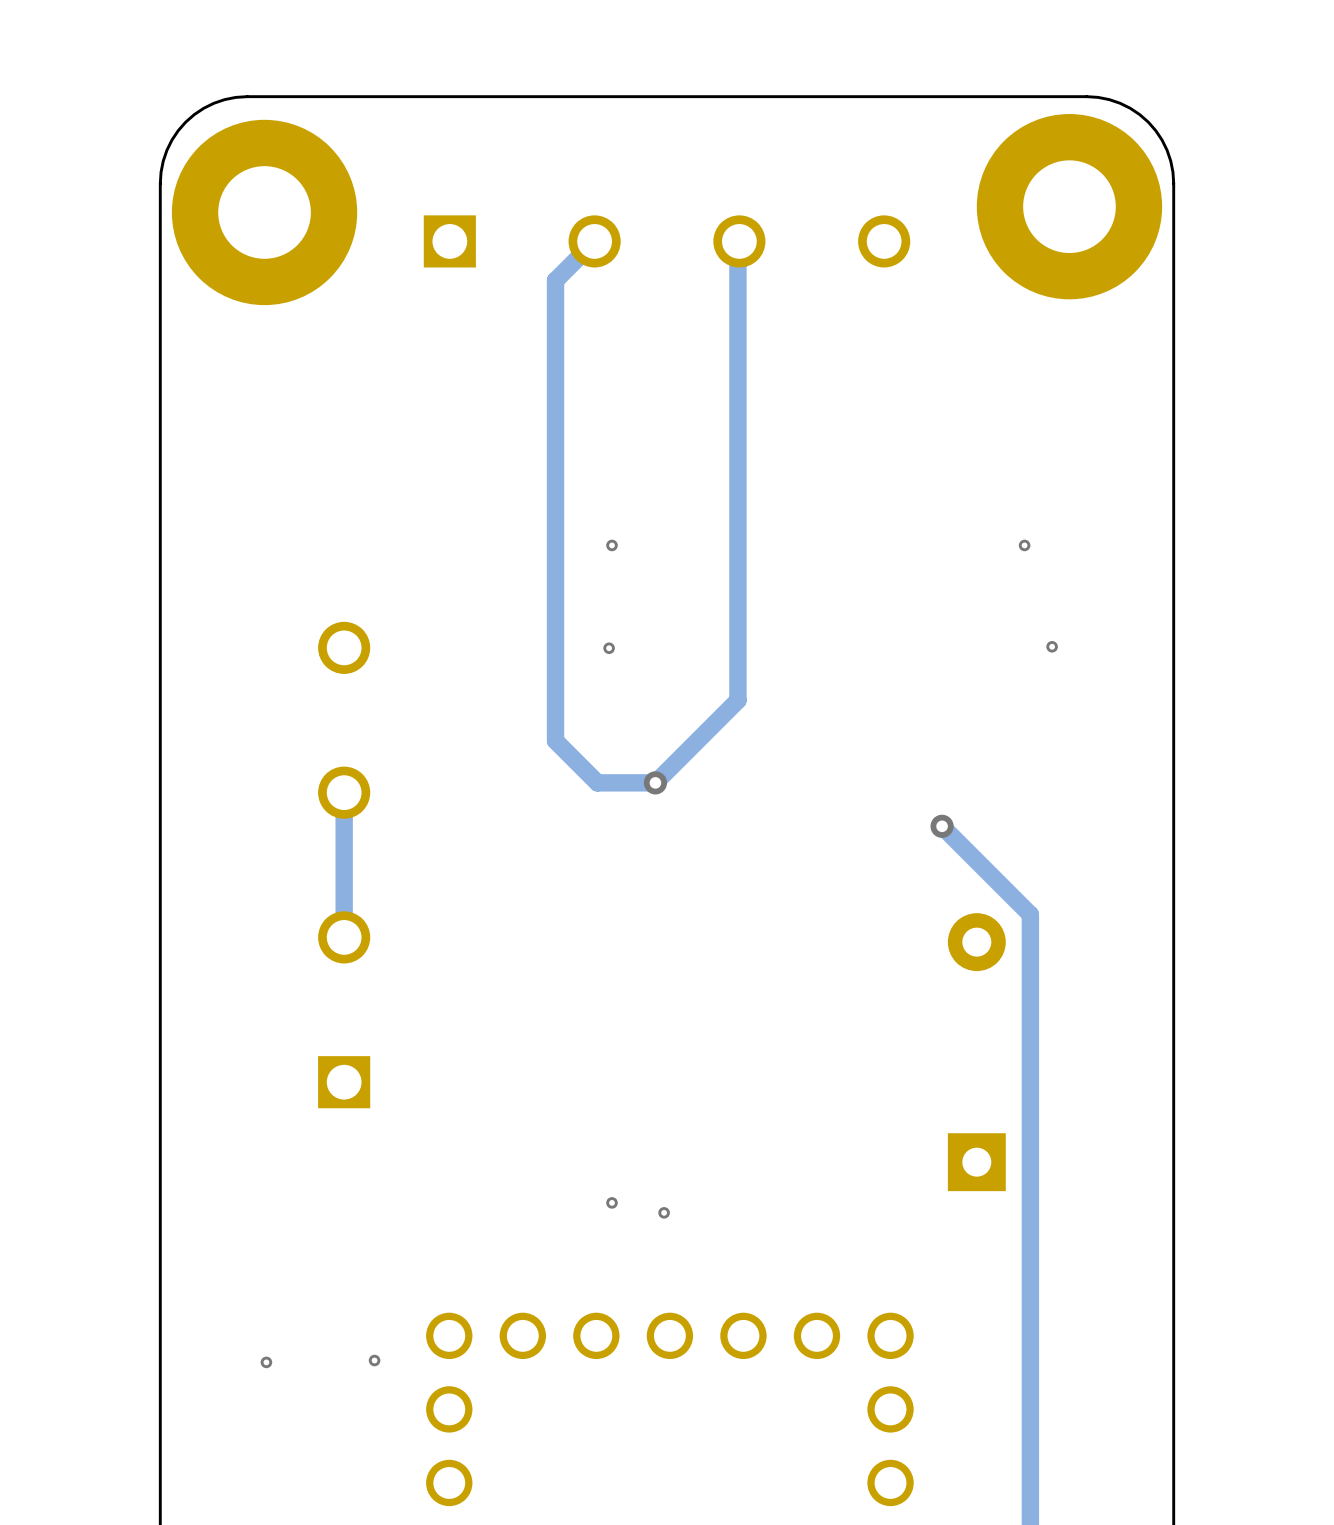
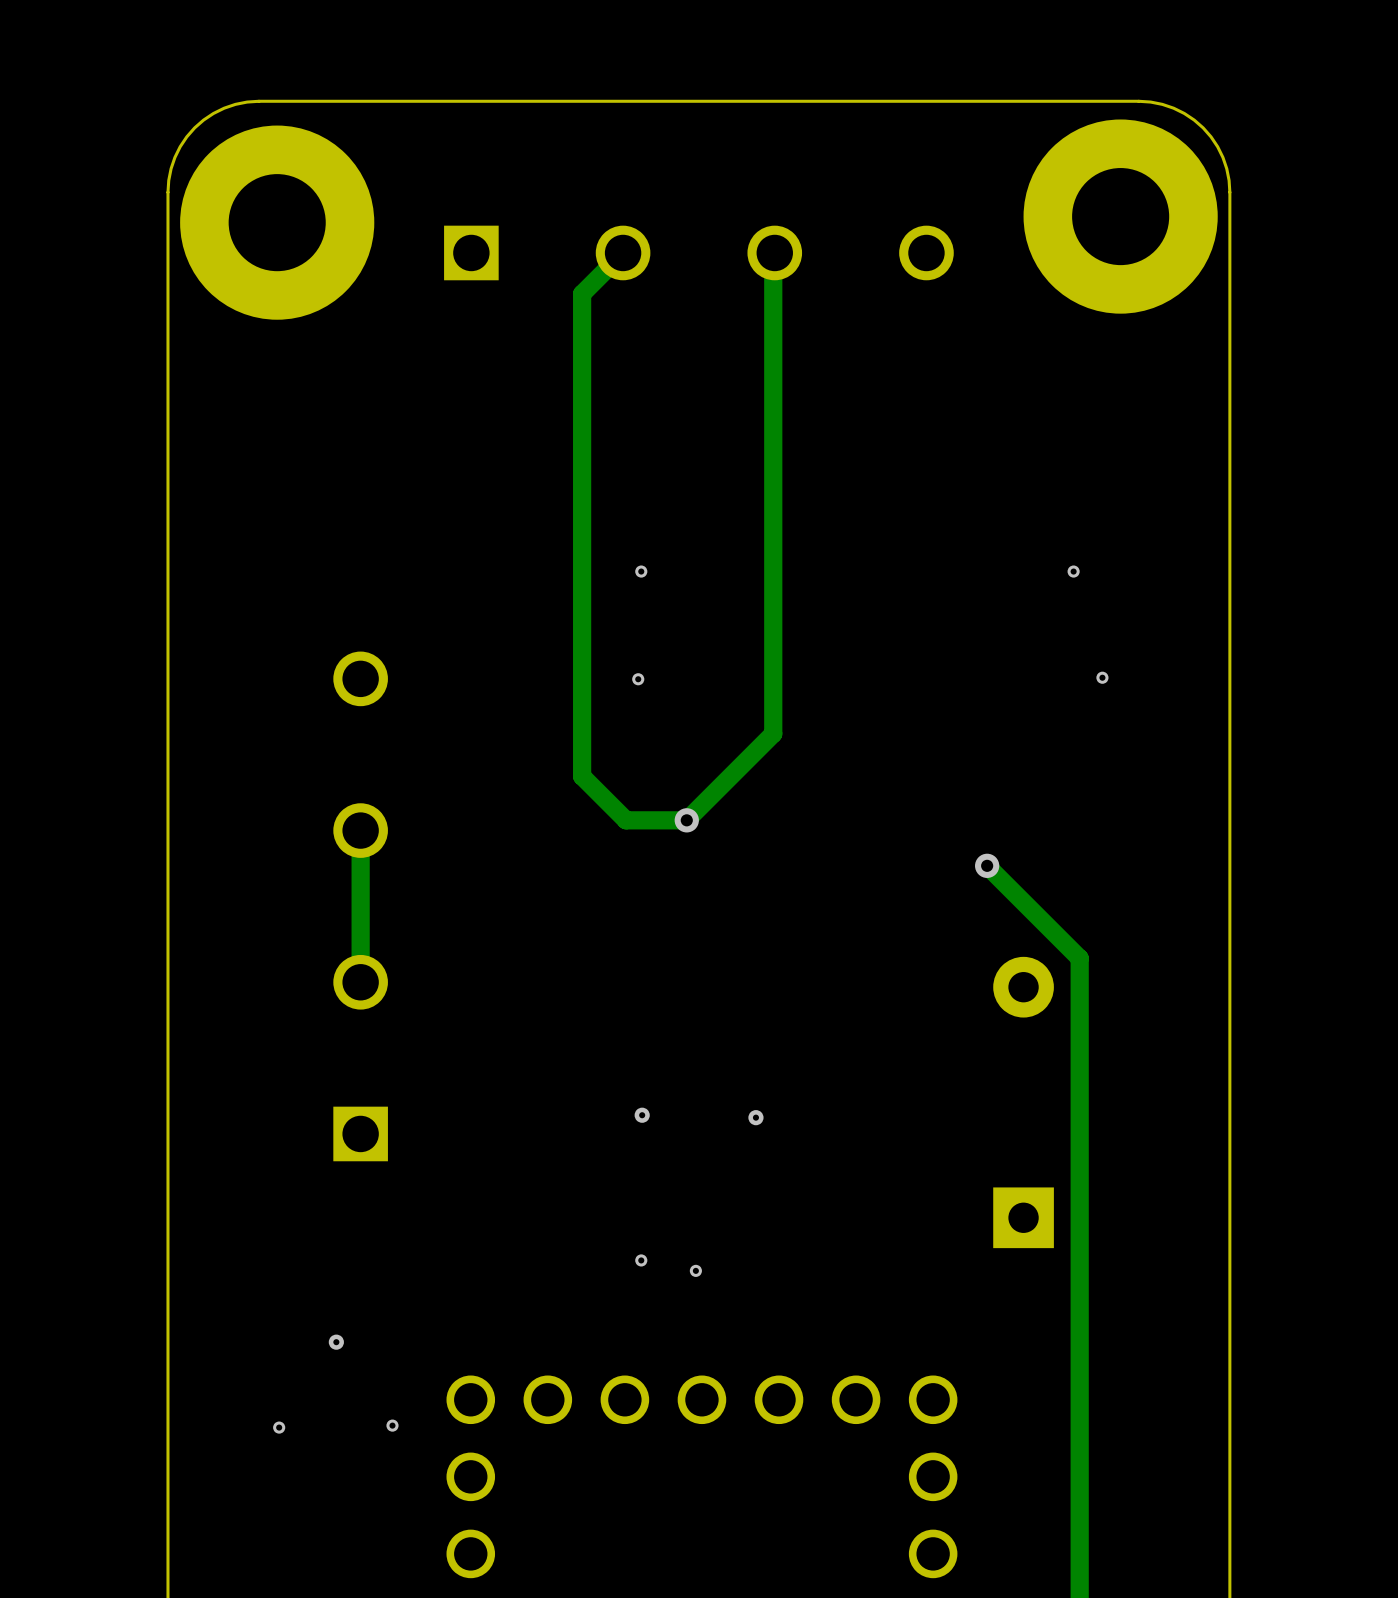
via: none -> (642, 1115)
via: none -> (755, 1117)
via: none -> (336, 1342)

